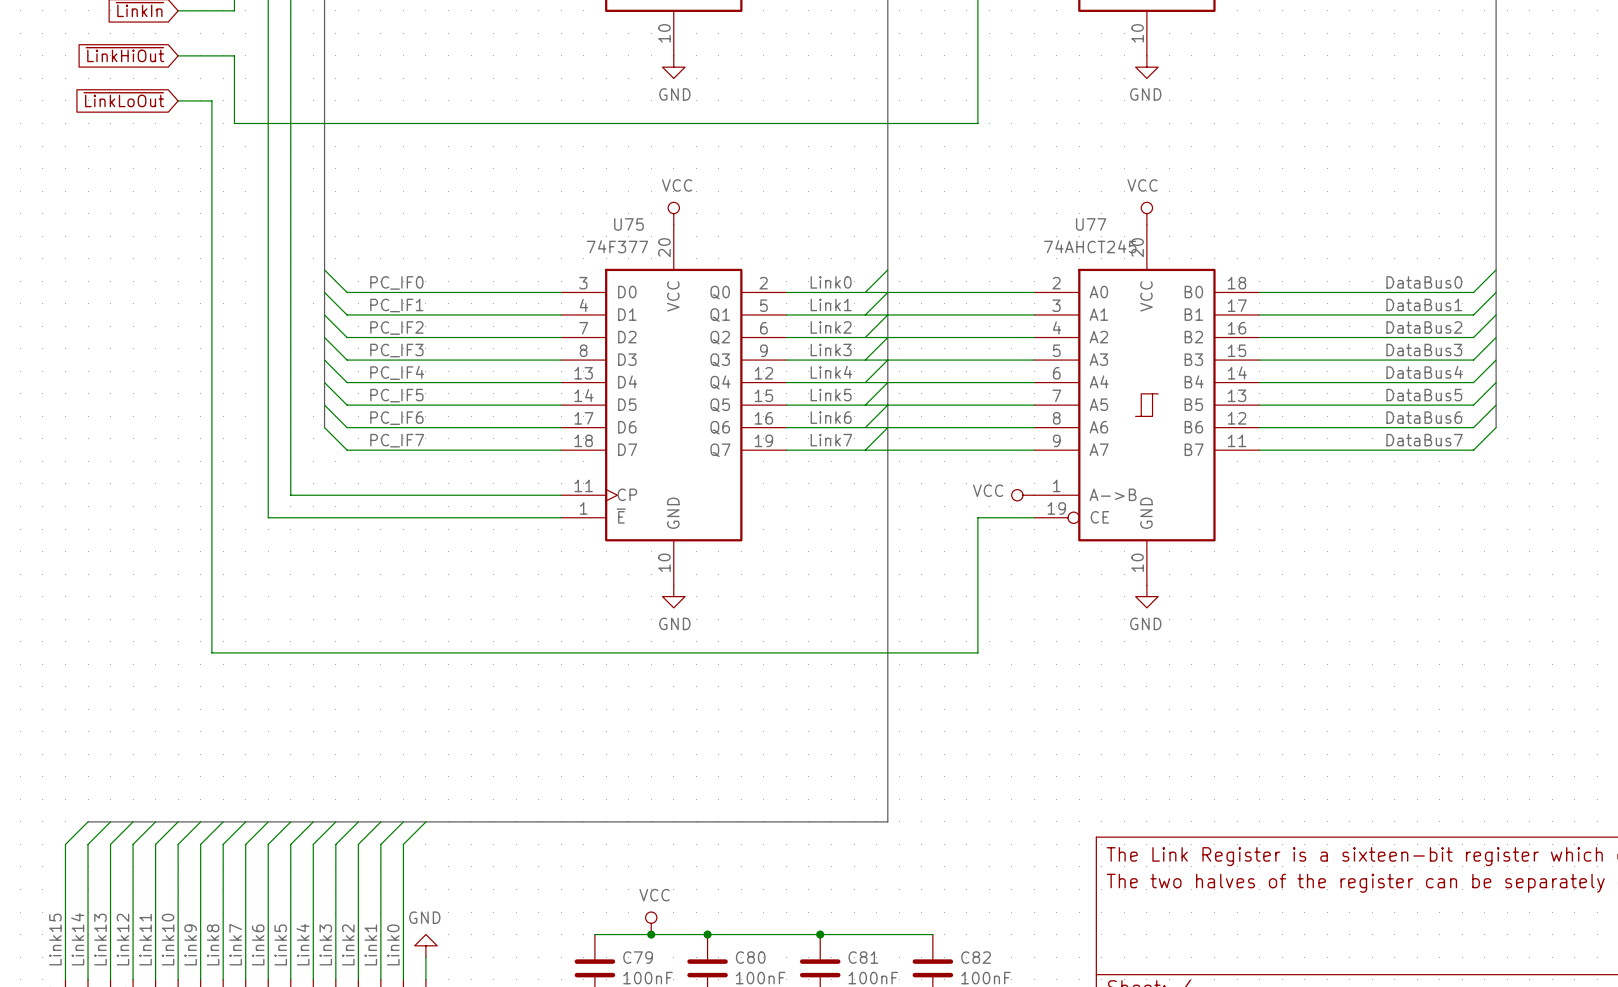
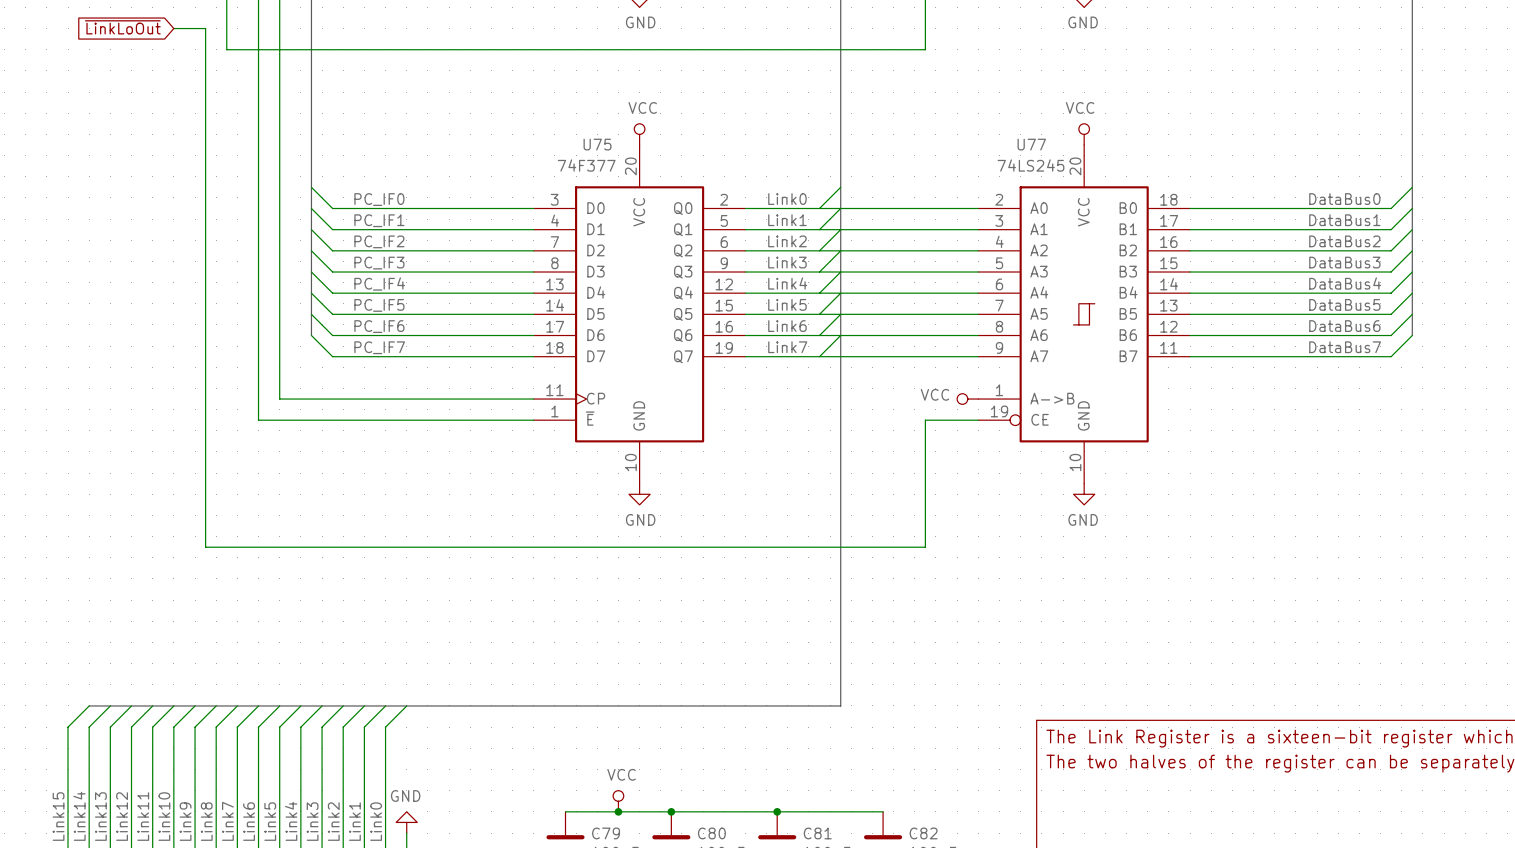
U77 value: 74AHCT245 (1090, 246) -> 74LS245 (1030, 165)

